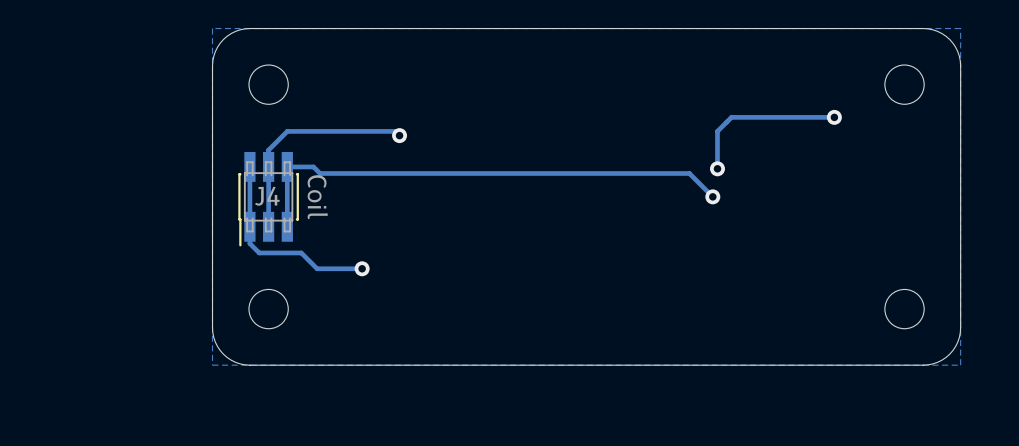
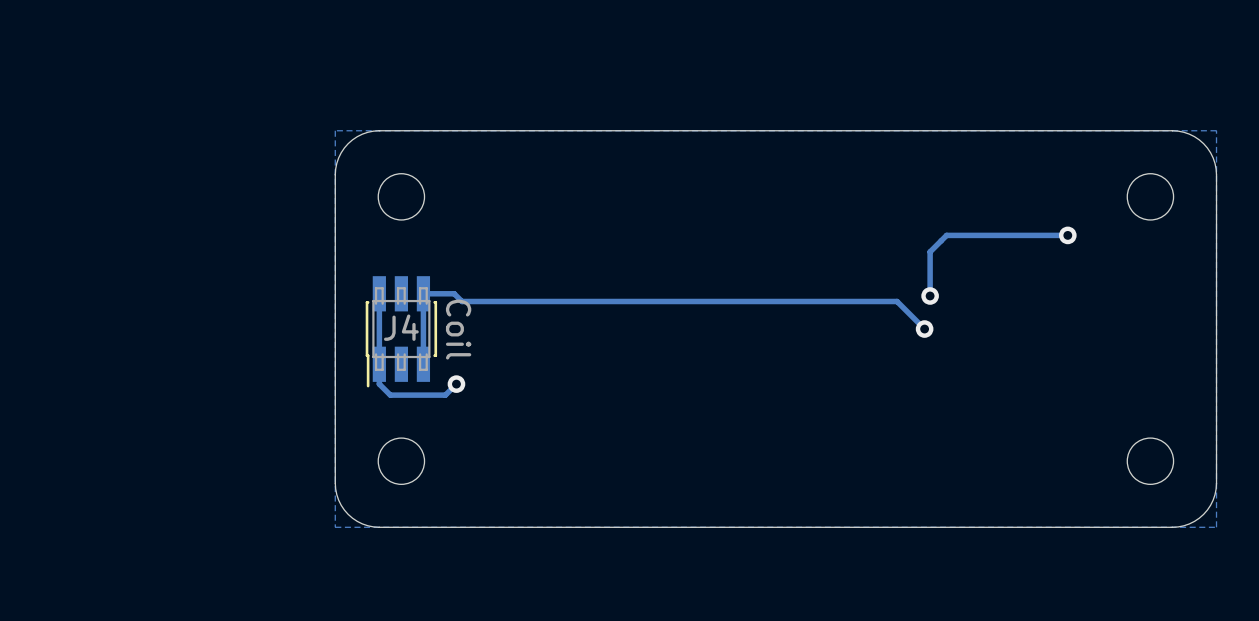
track: (399, 135) (395, 131) (287, 131) (268, 150) (268, 226) -> none
via: (399, 135) -> none
track: (301, 252) (317, 268) (362, 268) -> (439, 395) (445, 395) (456, 384)
via position: (362, 268) -> (456, 384)

